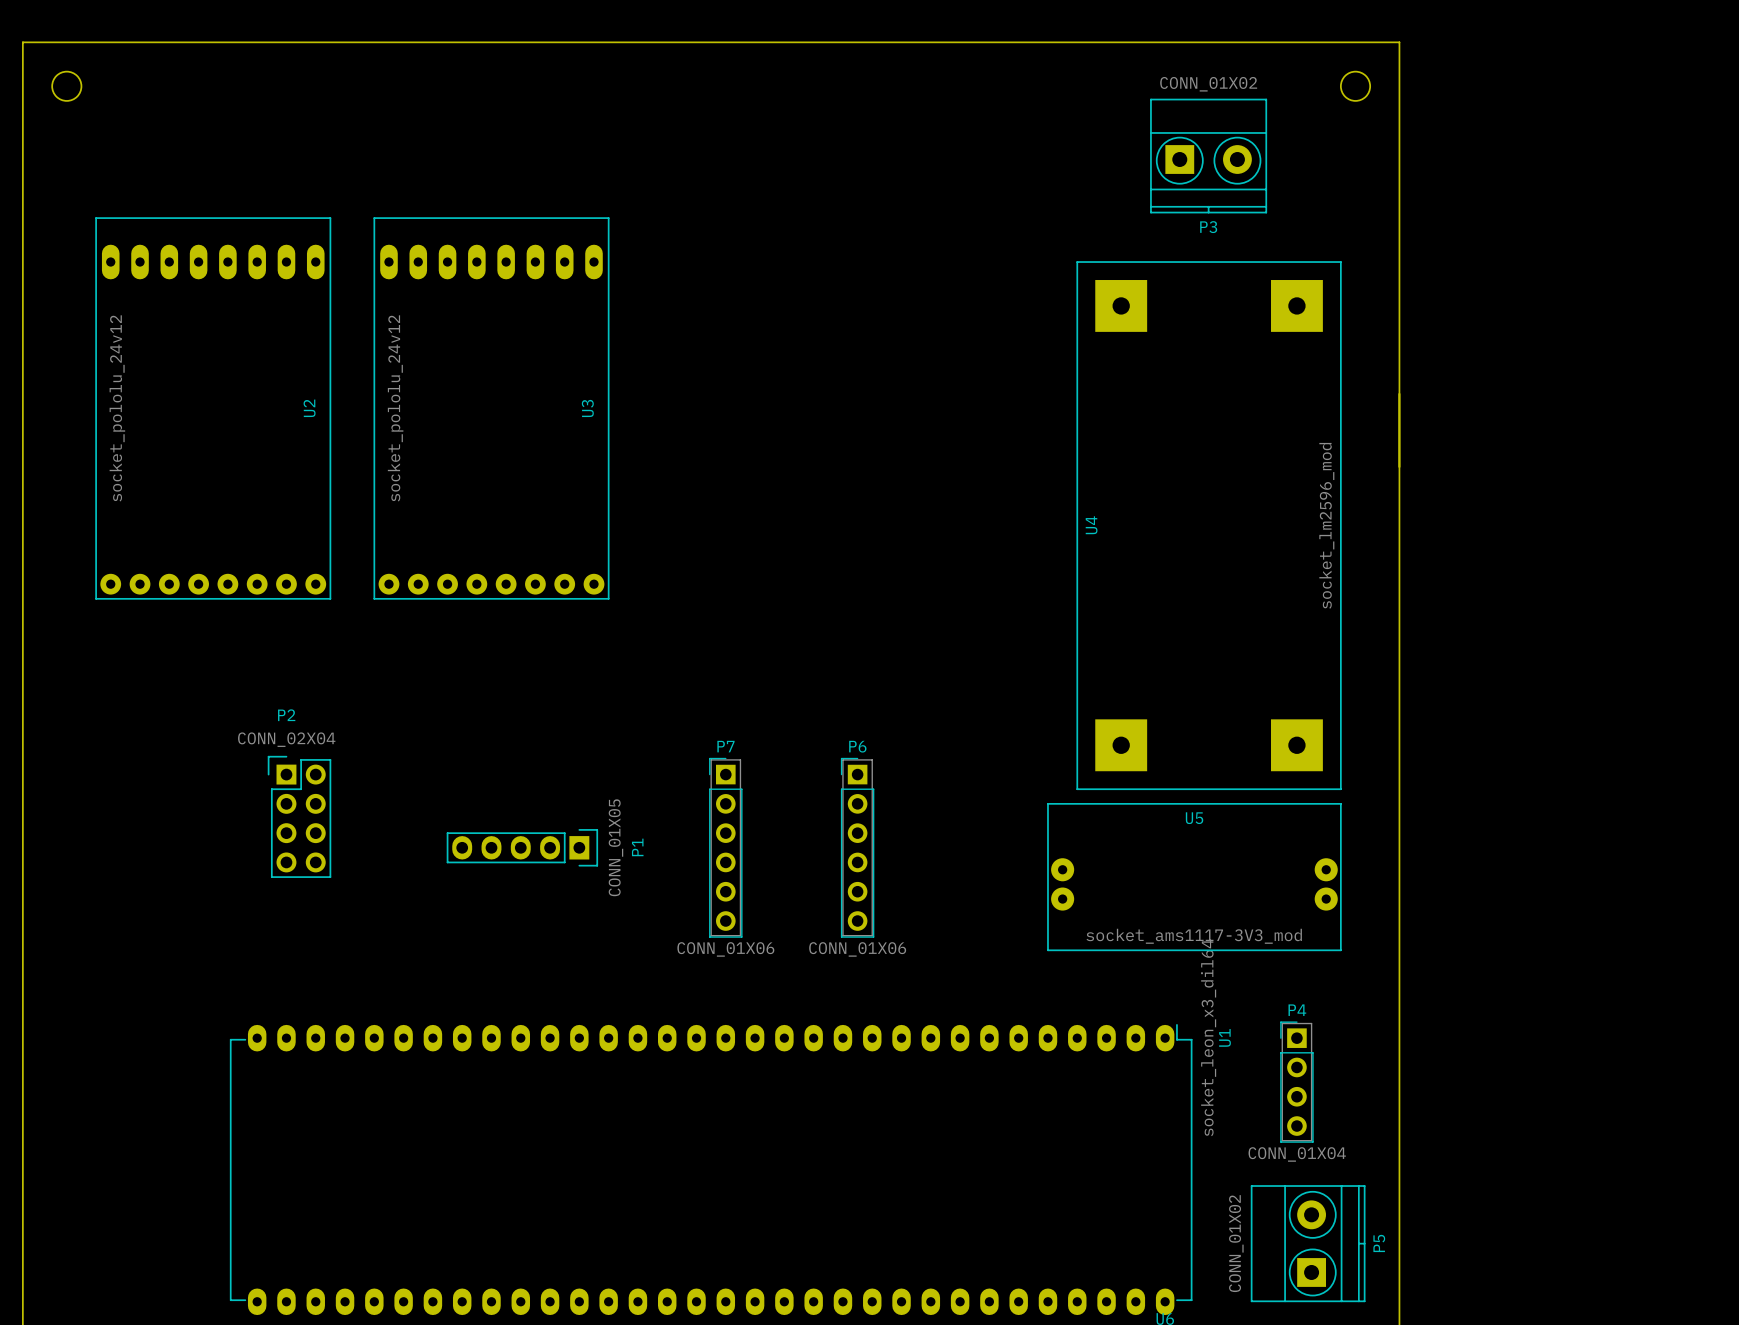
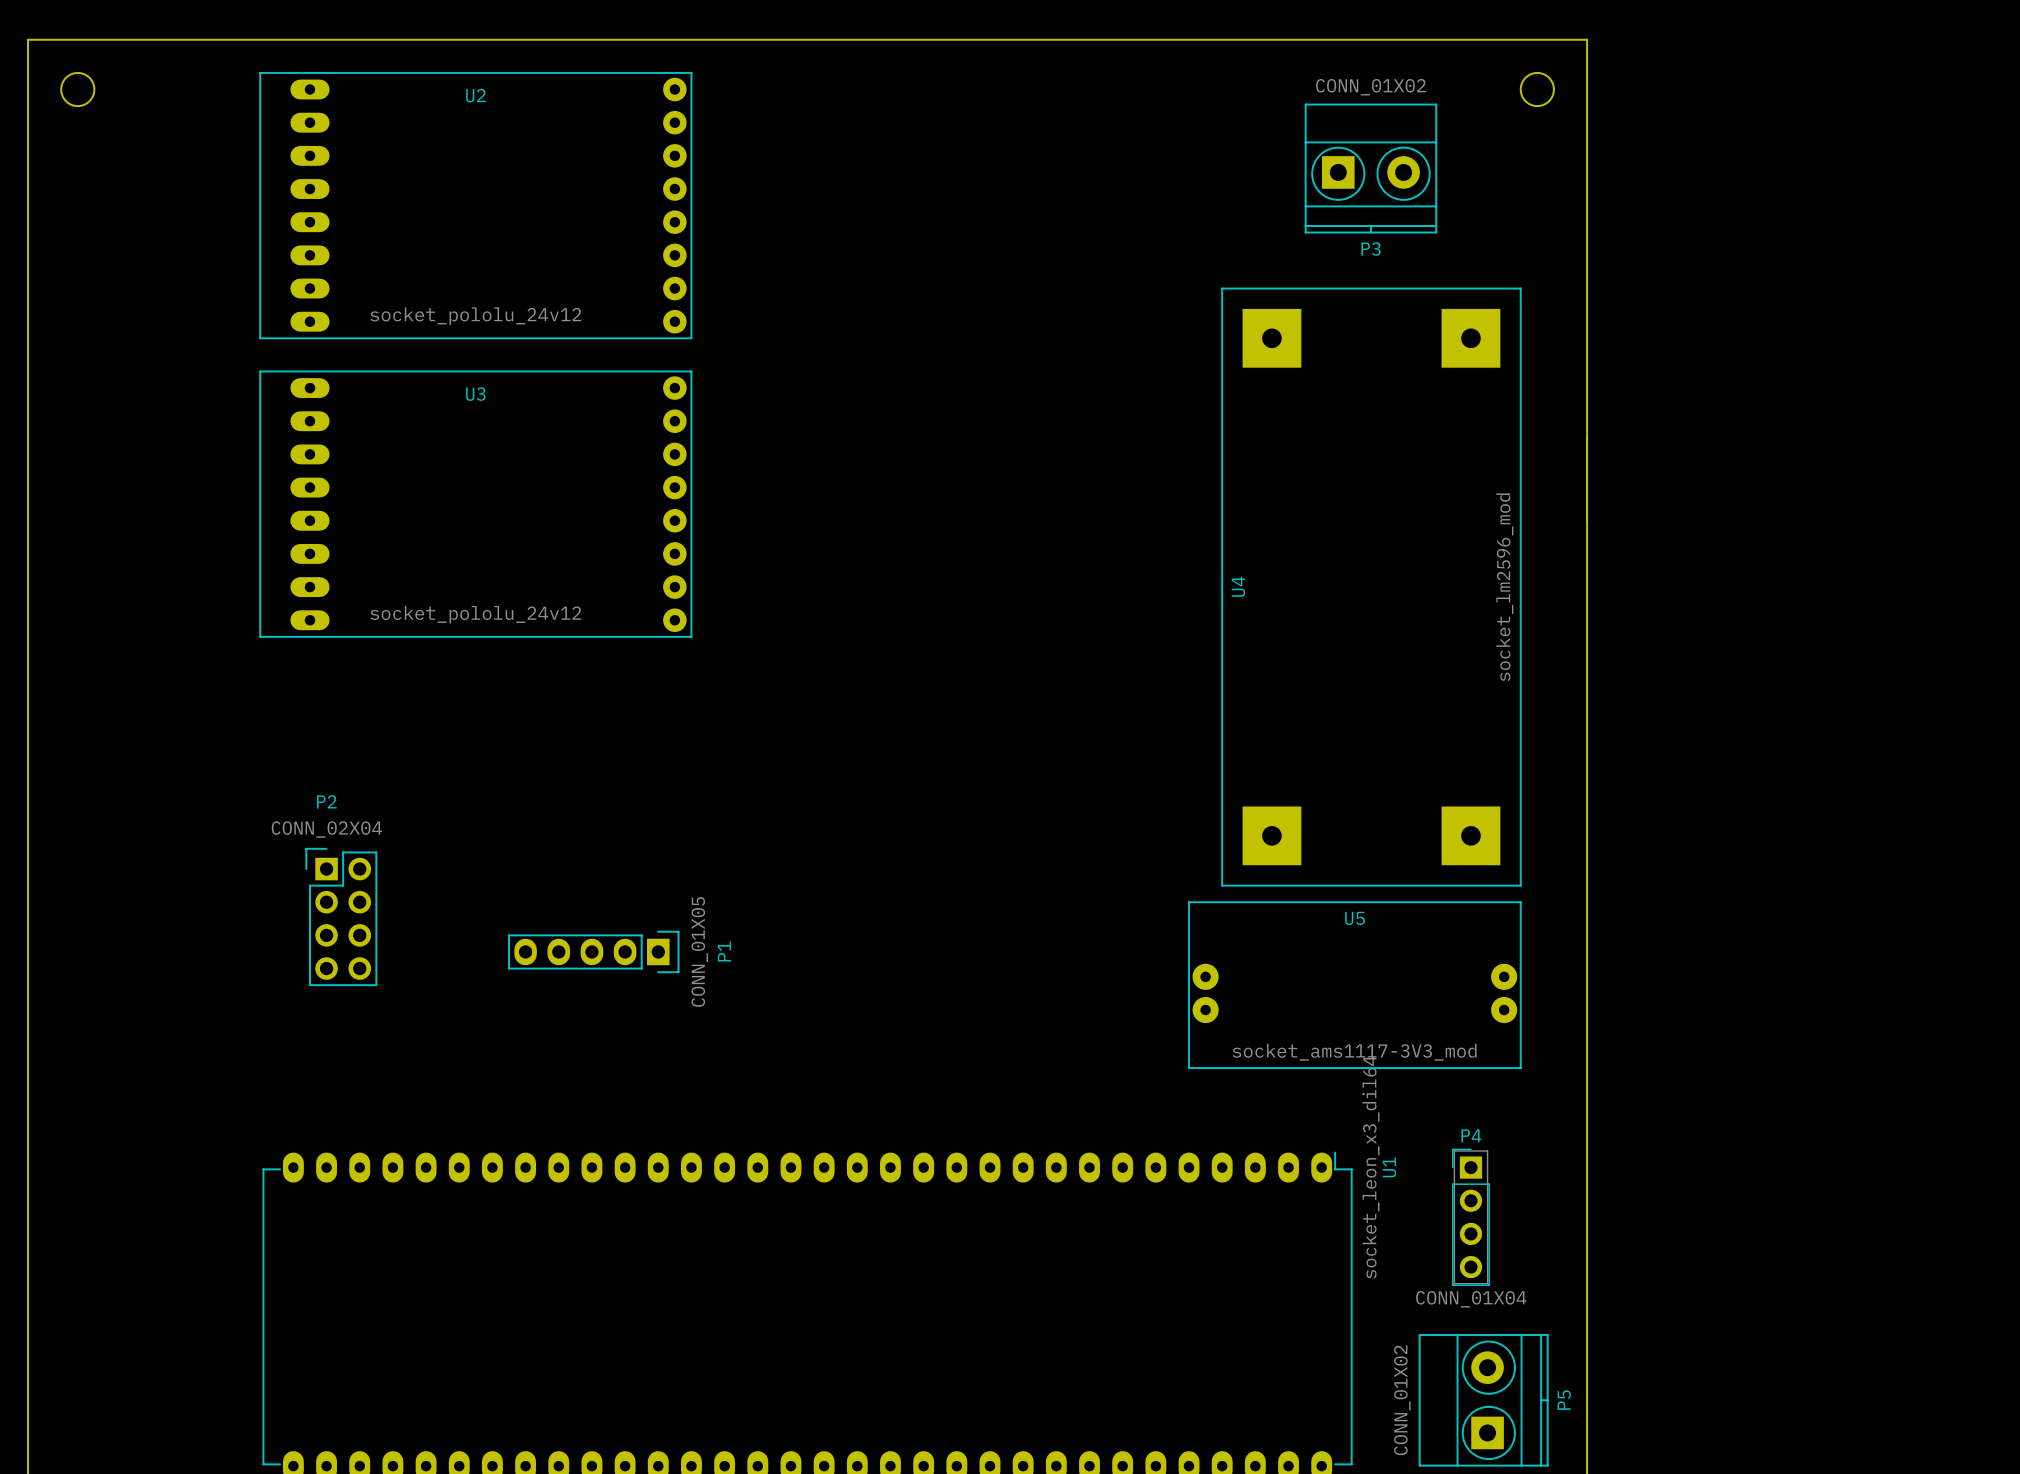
U2 rotation: 0° (213, 408) -> 90° counterclockwise (475, 205)
U2 position: (213, 408) -> (475, 205)
U3 rotation: 0° (491, 408) -> 90° counterclockwise (475, 504)
P7: CONN_01X06 (725, 847) -> none
P6: CONN_01X06 (857, 847) -> none

